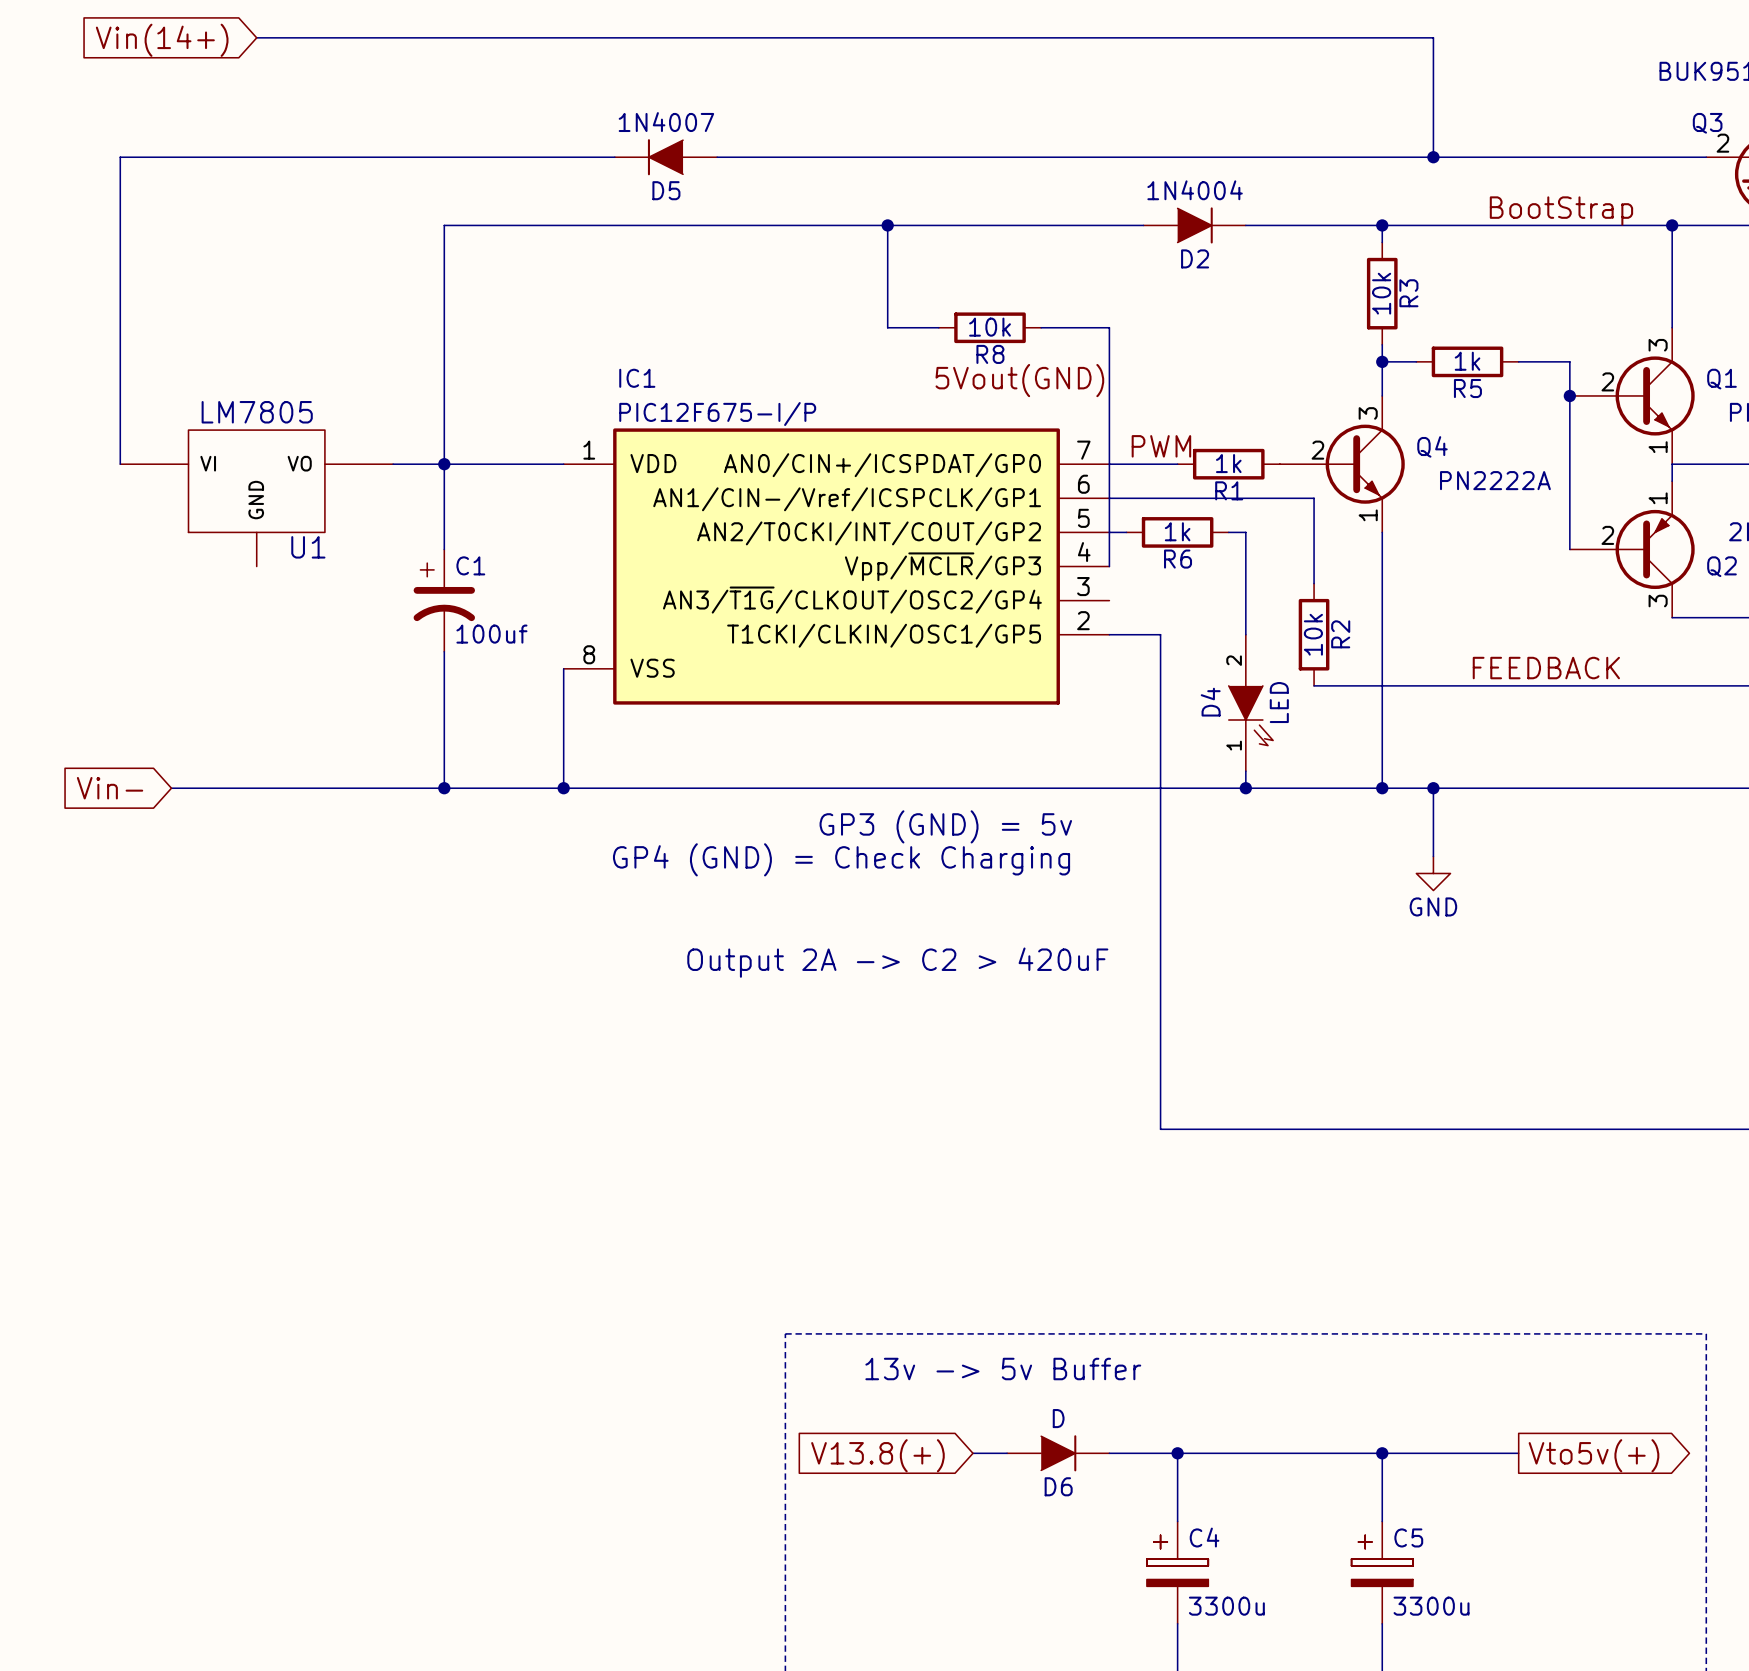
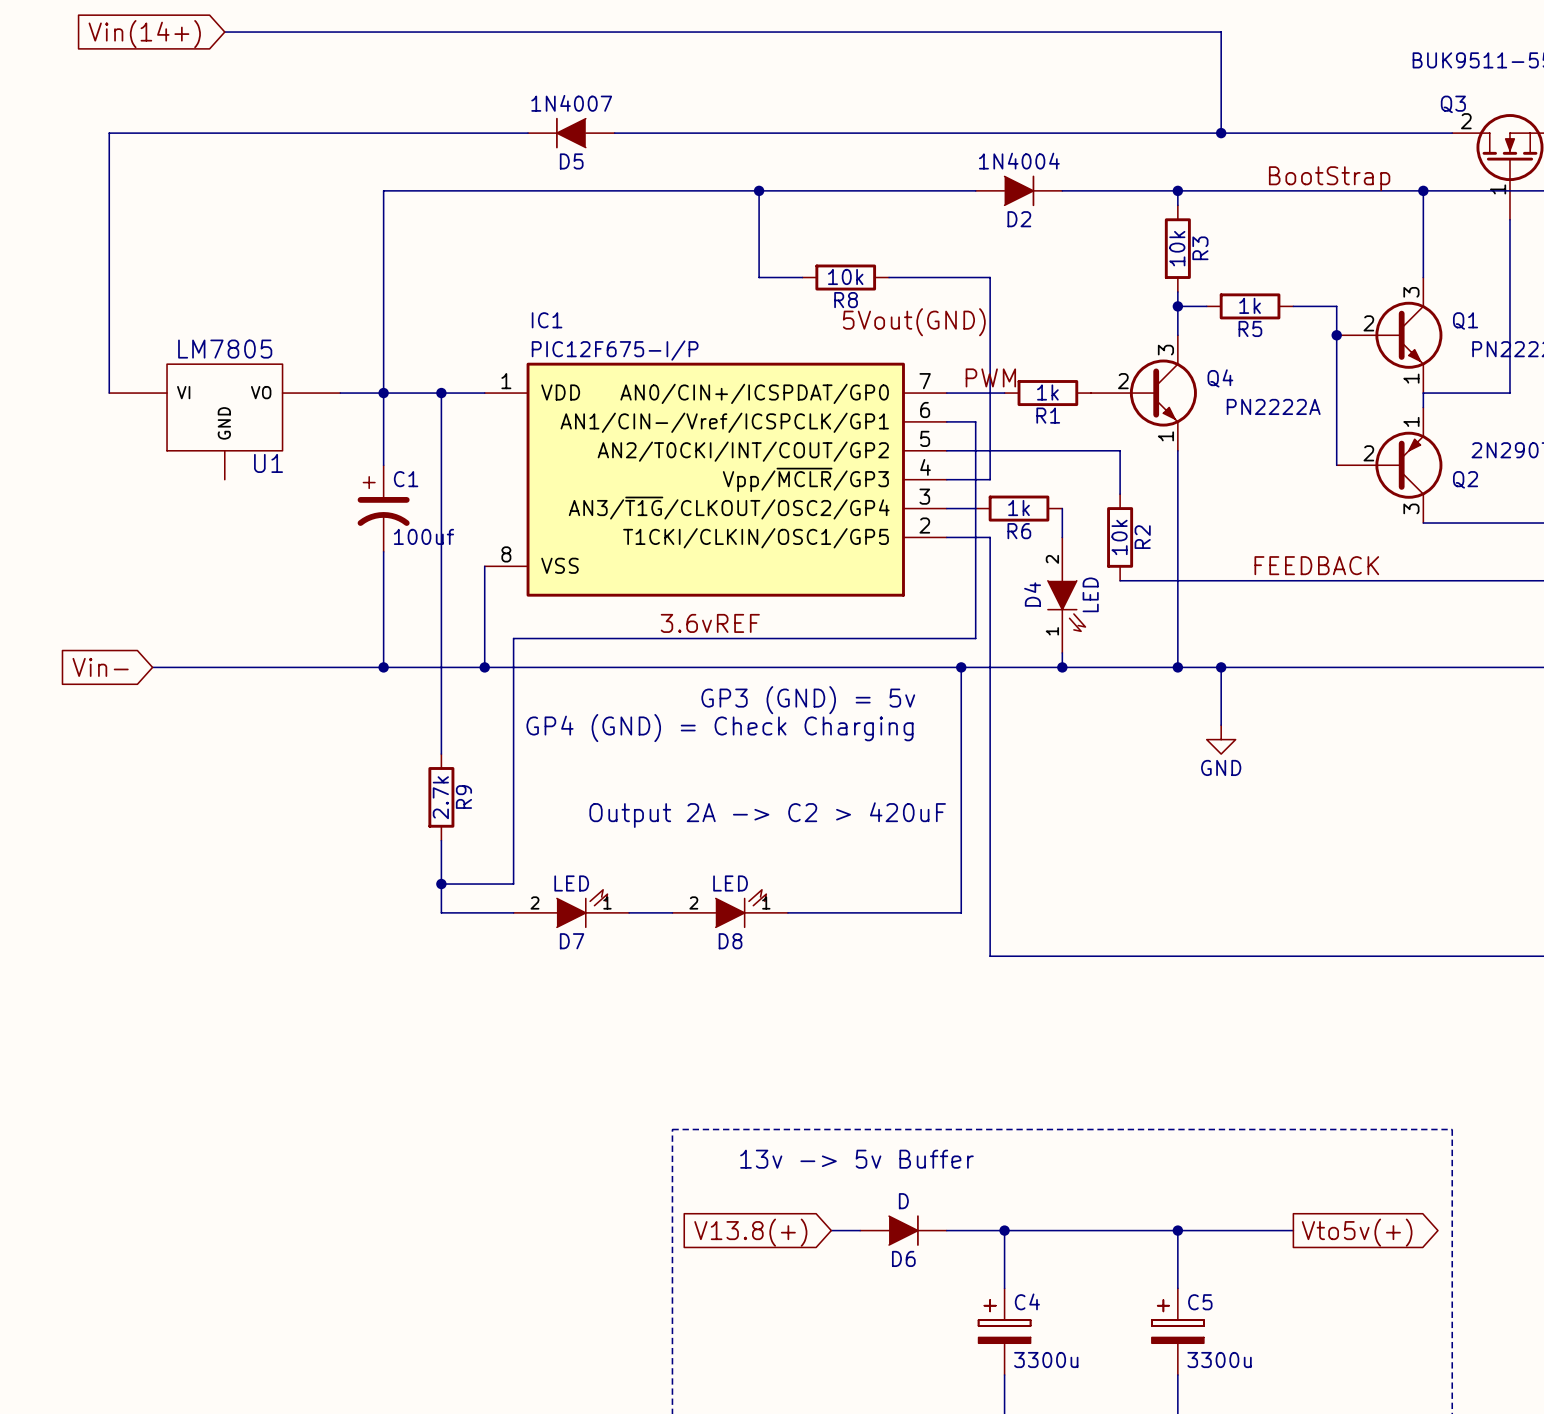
wire: (1109, 327) (1109, 566) -> (946, 277) (990, 277) (990, 479) (946, 479)
label position: 5Vout(GND) (1019, 380) -> 5Vout(GND) (914, 322)
wire: none -> (441, 393) (441, 754)
junction: none -> (441, 393)
wire: (1143, 498) (1314, 498) (1314, 532) -> (975, 421) (975, 638) (513, 638) (513, 884) (441, 884)
wire: none -> (961, 450) (1047, 450)
R6 position: (1177, 532) -> (1019, 508)
wire: (1245, 532) (1245, 600) -> (1062, 450) (1120, 450)
wire: none -> (946, 508) (975, 508)
label: none -> 3.6vREF (710, 623)
wire: none -> (961, 667) (961, 912) (787, 912)
junction: none -> (961, 667)
R9: none -> 2.7k (441, 797)
wire: none -> (441, 840) (441, 912) (513, 912)
junction: none -> (441, 884)
D7: none -> LED (571, 908)
D8: none -> LED (730, 908)
wire: none -> (629, 912) (672, 912)

